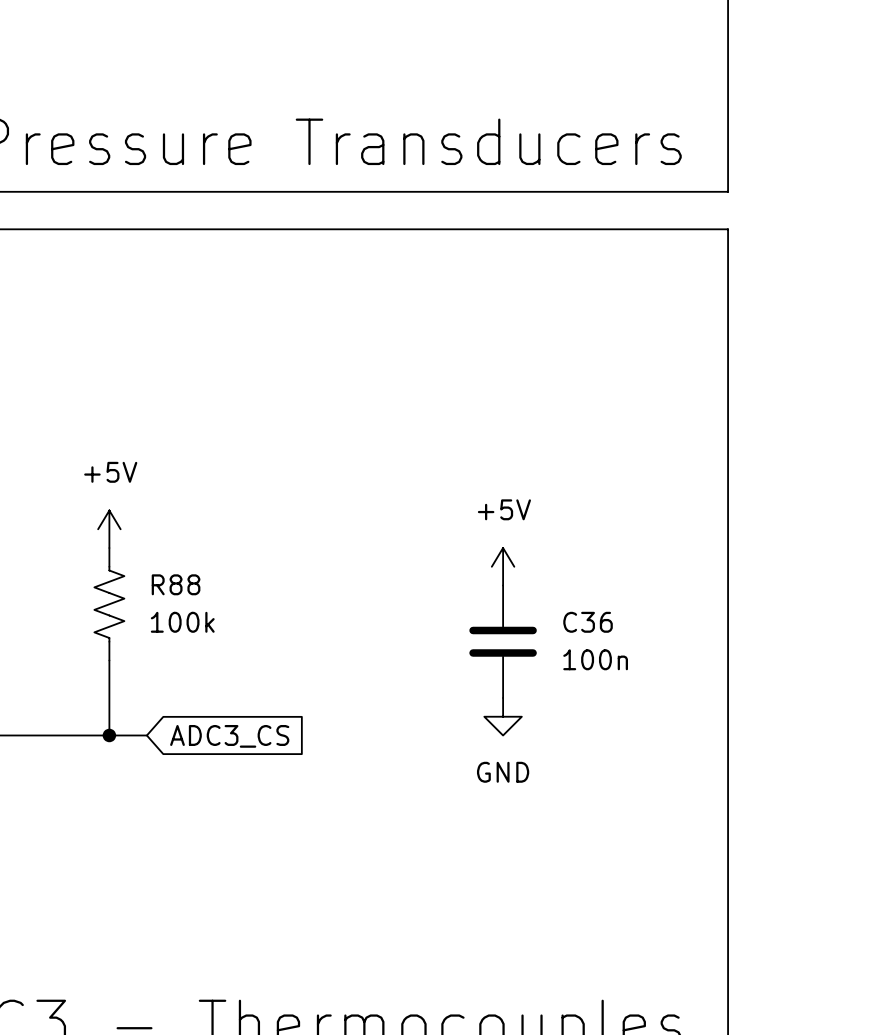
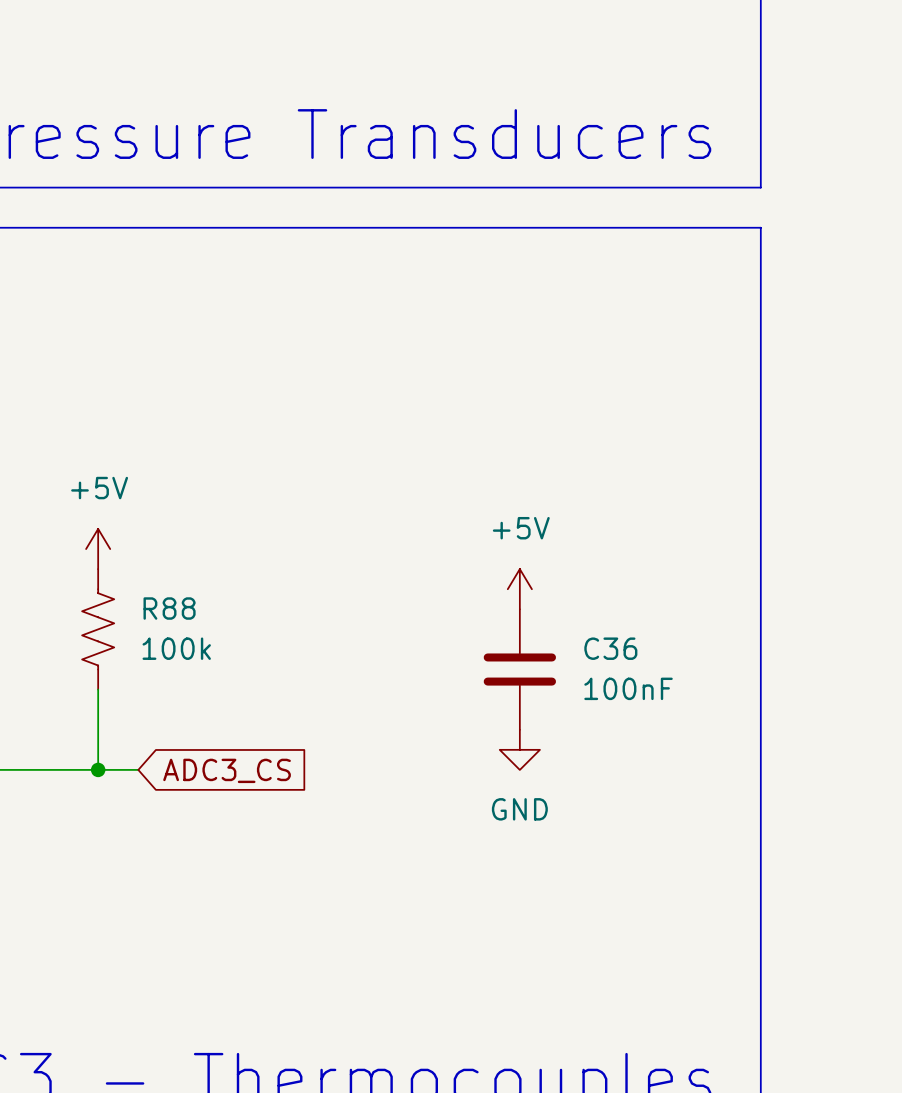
C36 value: 100n (595, 659) -> 100nF (628, 688)

